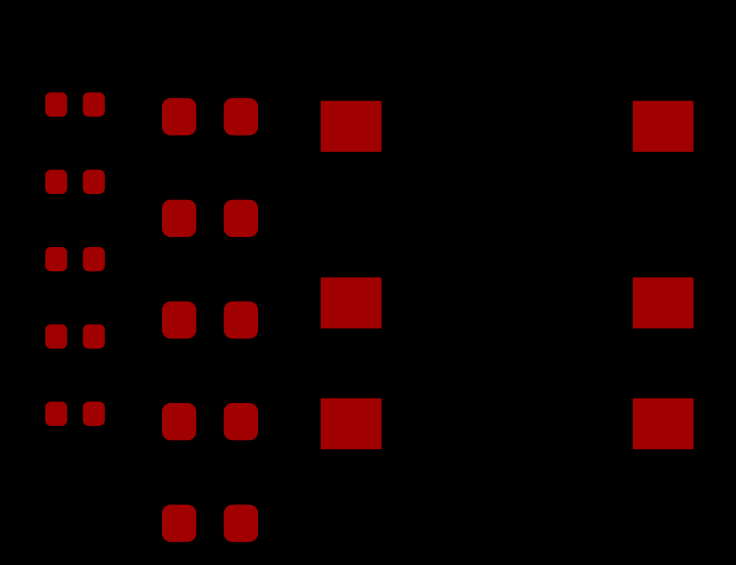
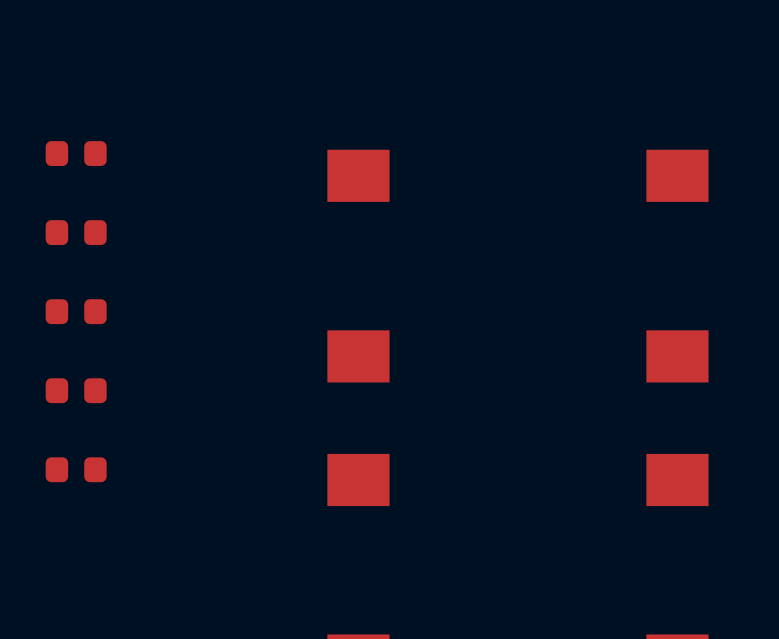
part: (210, 116) -> none
part: (210, 218) -> none
part: (210, 320) -> none
part: (210, 421) -> none
part: (210, 523) -> none

